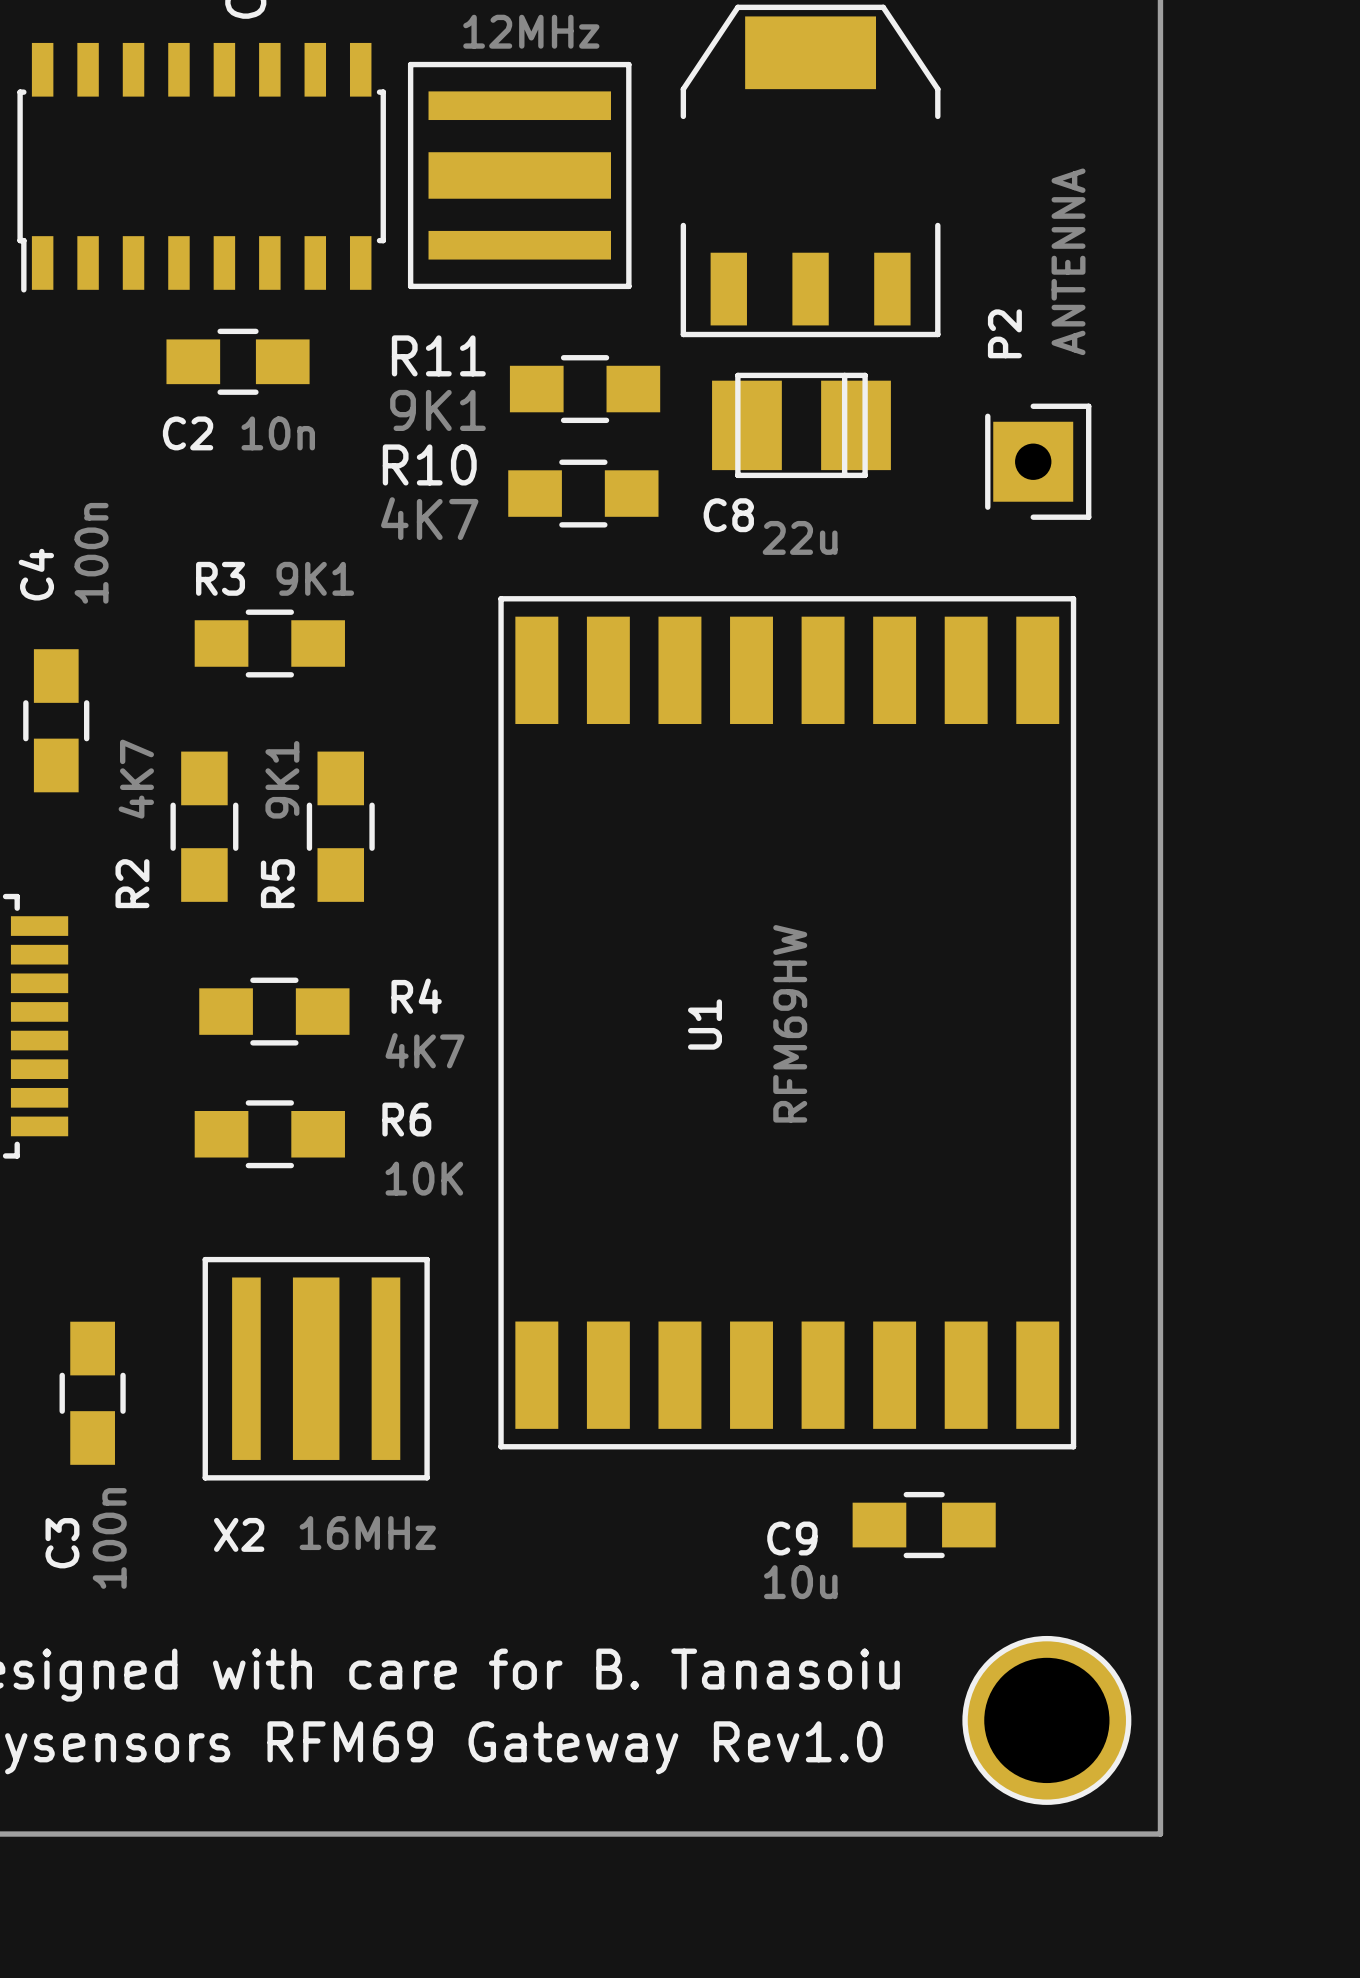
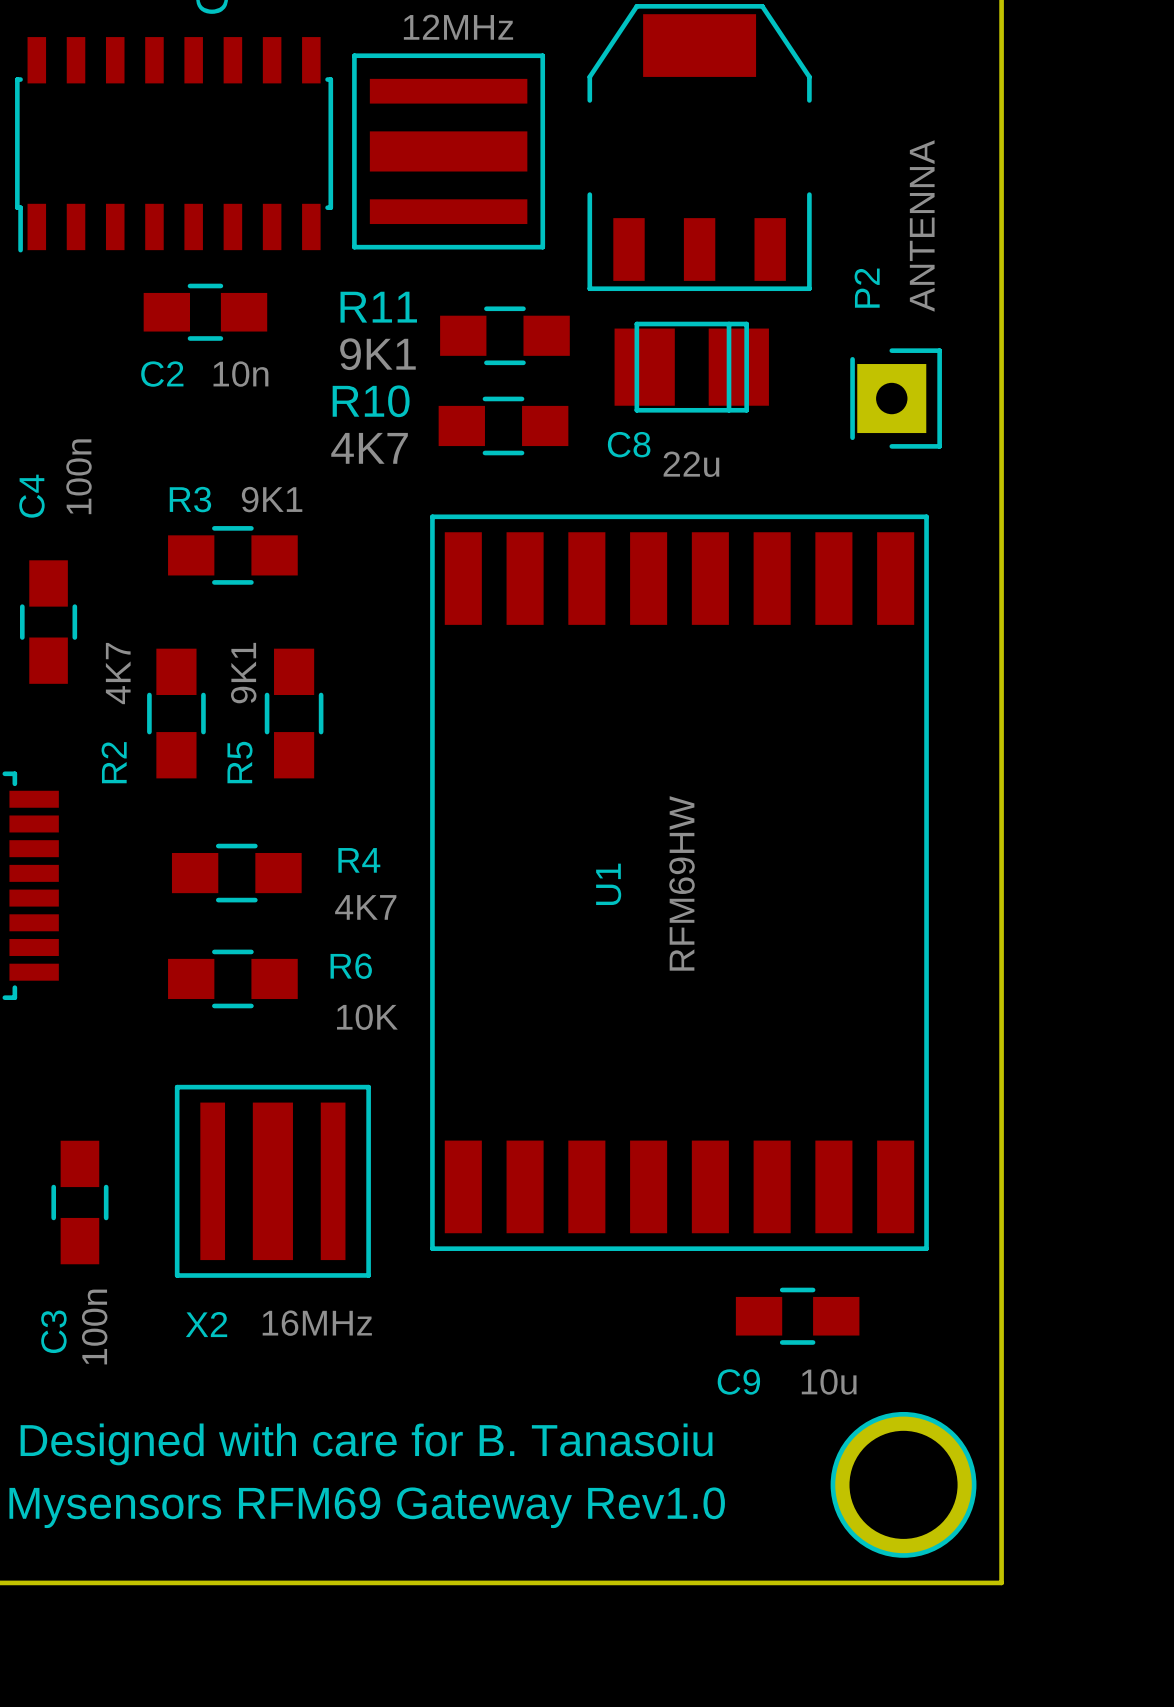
C9 name position: C9 (792, 1538) -> C9 (738, 1381)
C9 value position: 10u (800, 1582) -> 10u (829, 1381)

